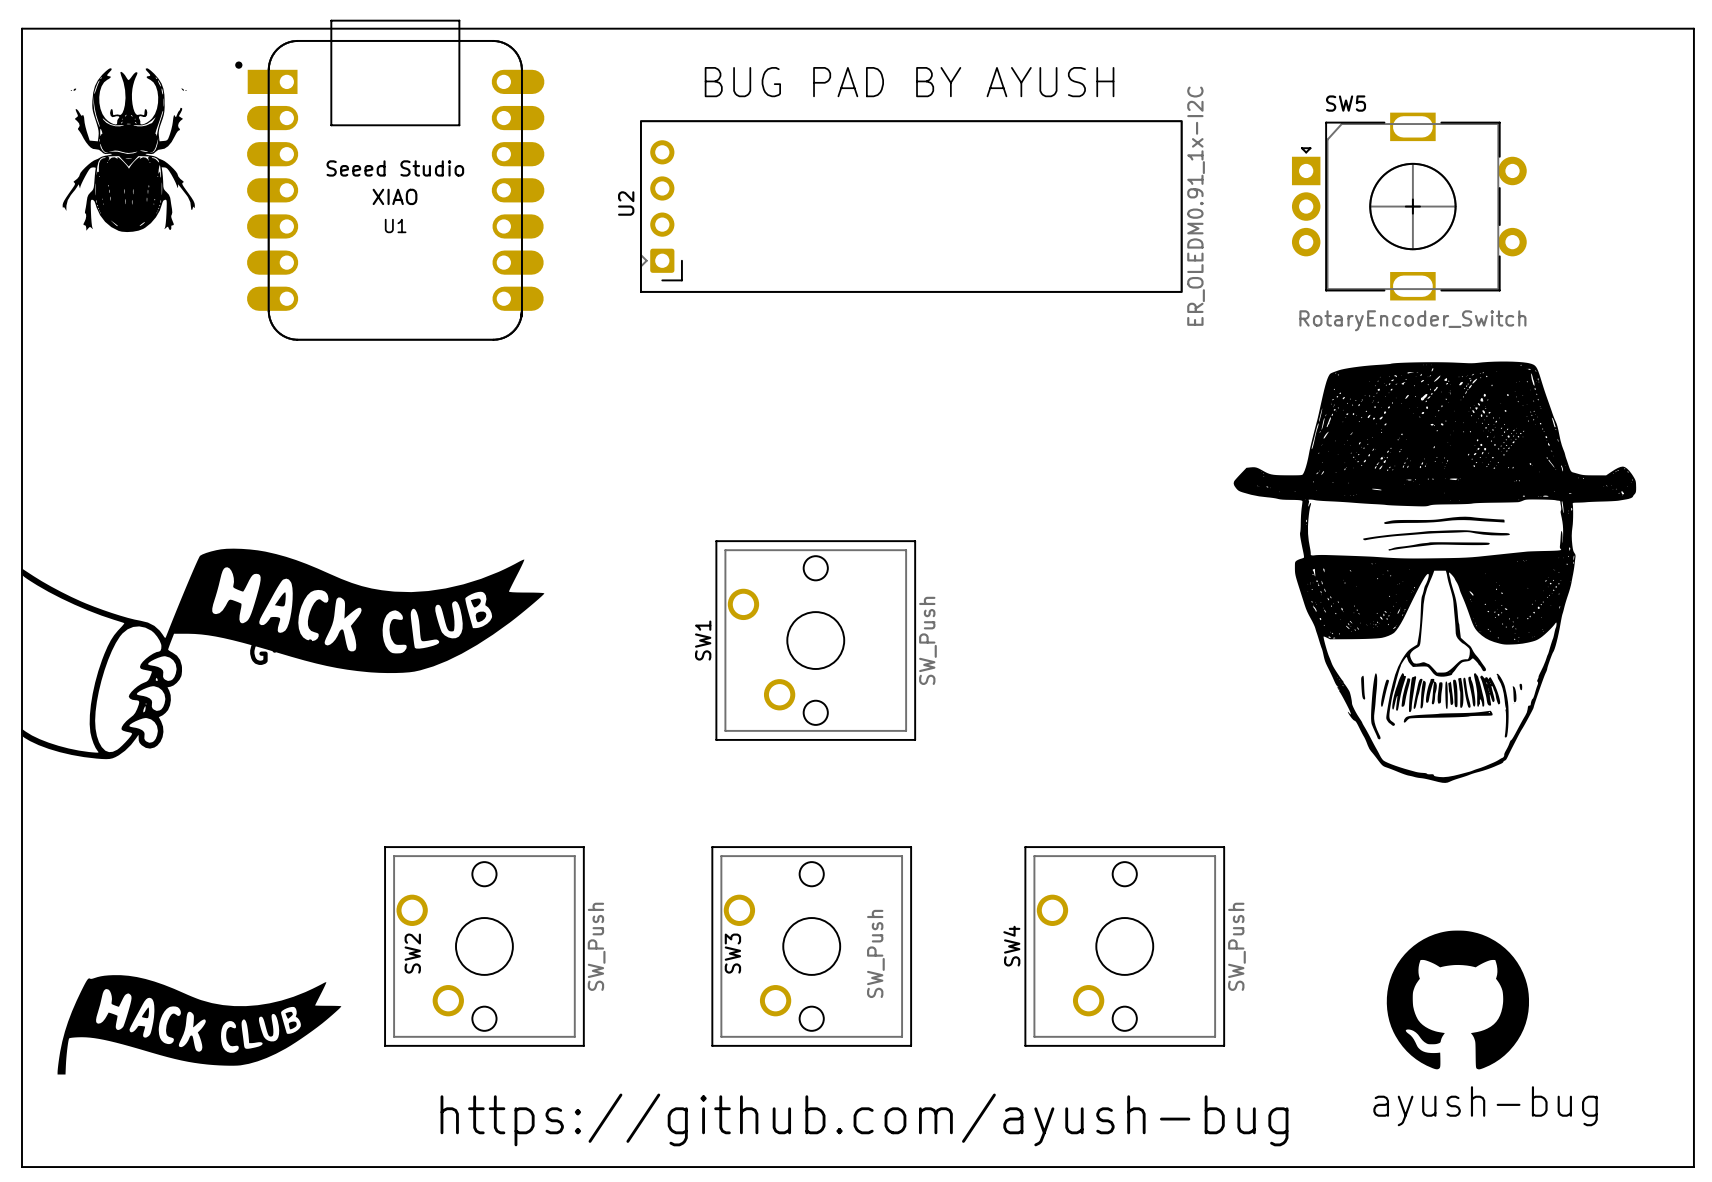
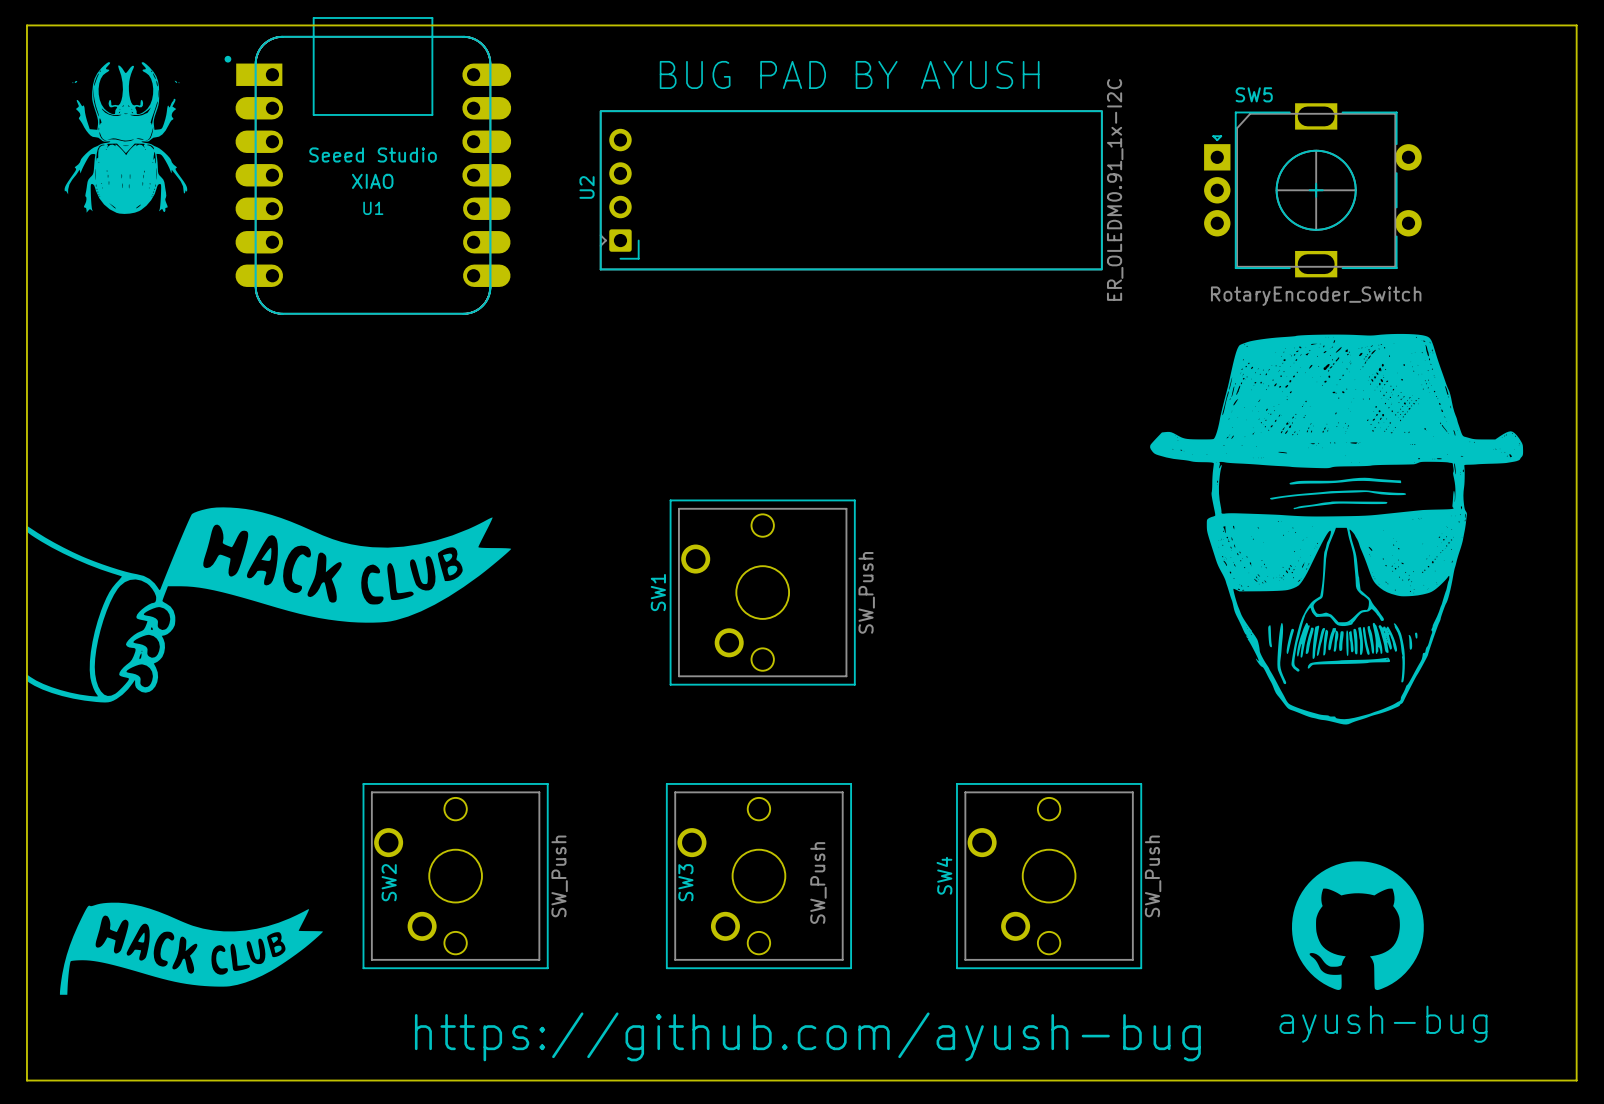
drawing: none -> [26, 507, 512, 703]
part: (282, 653) -> none

